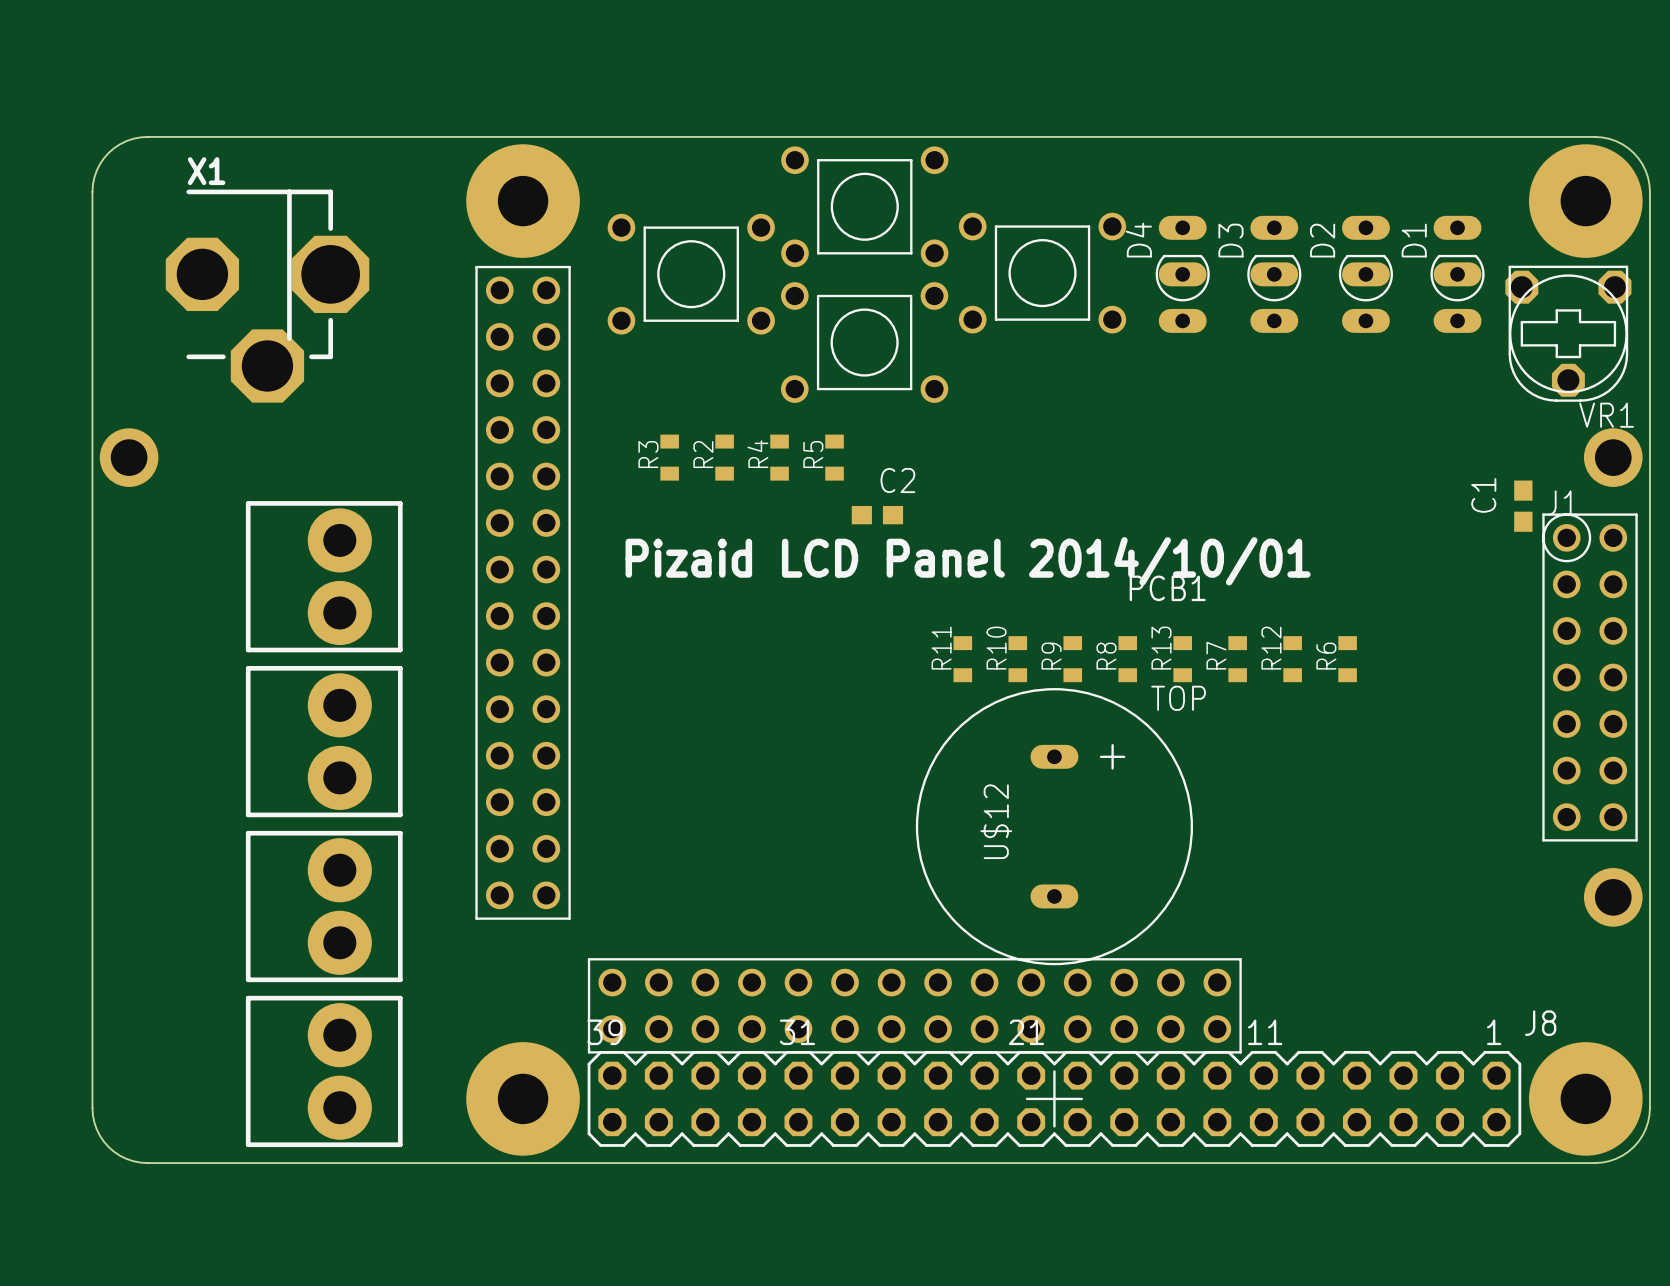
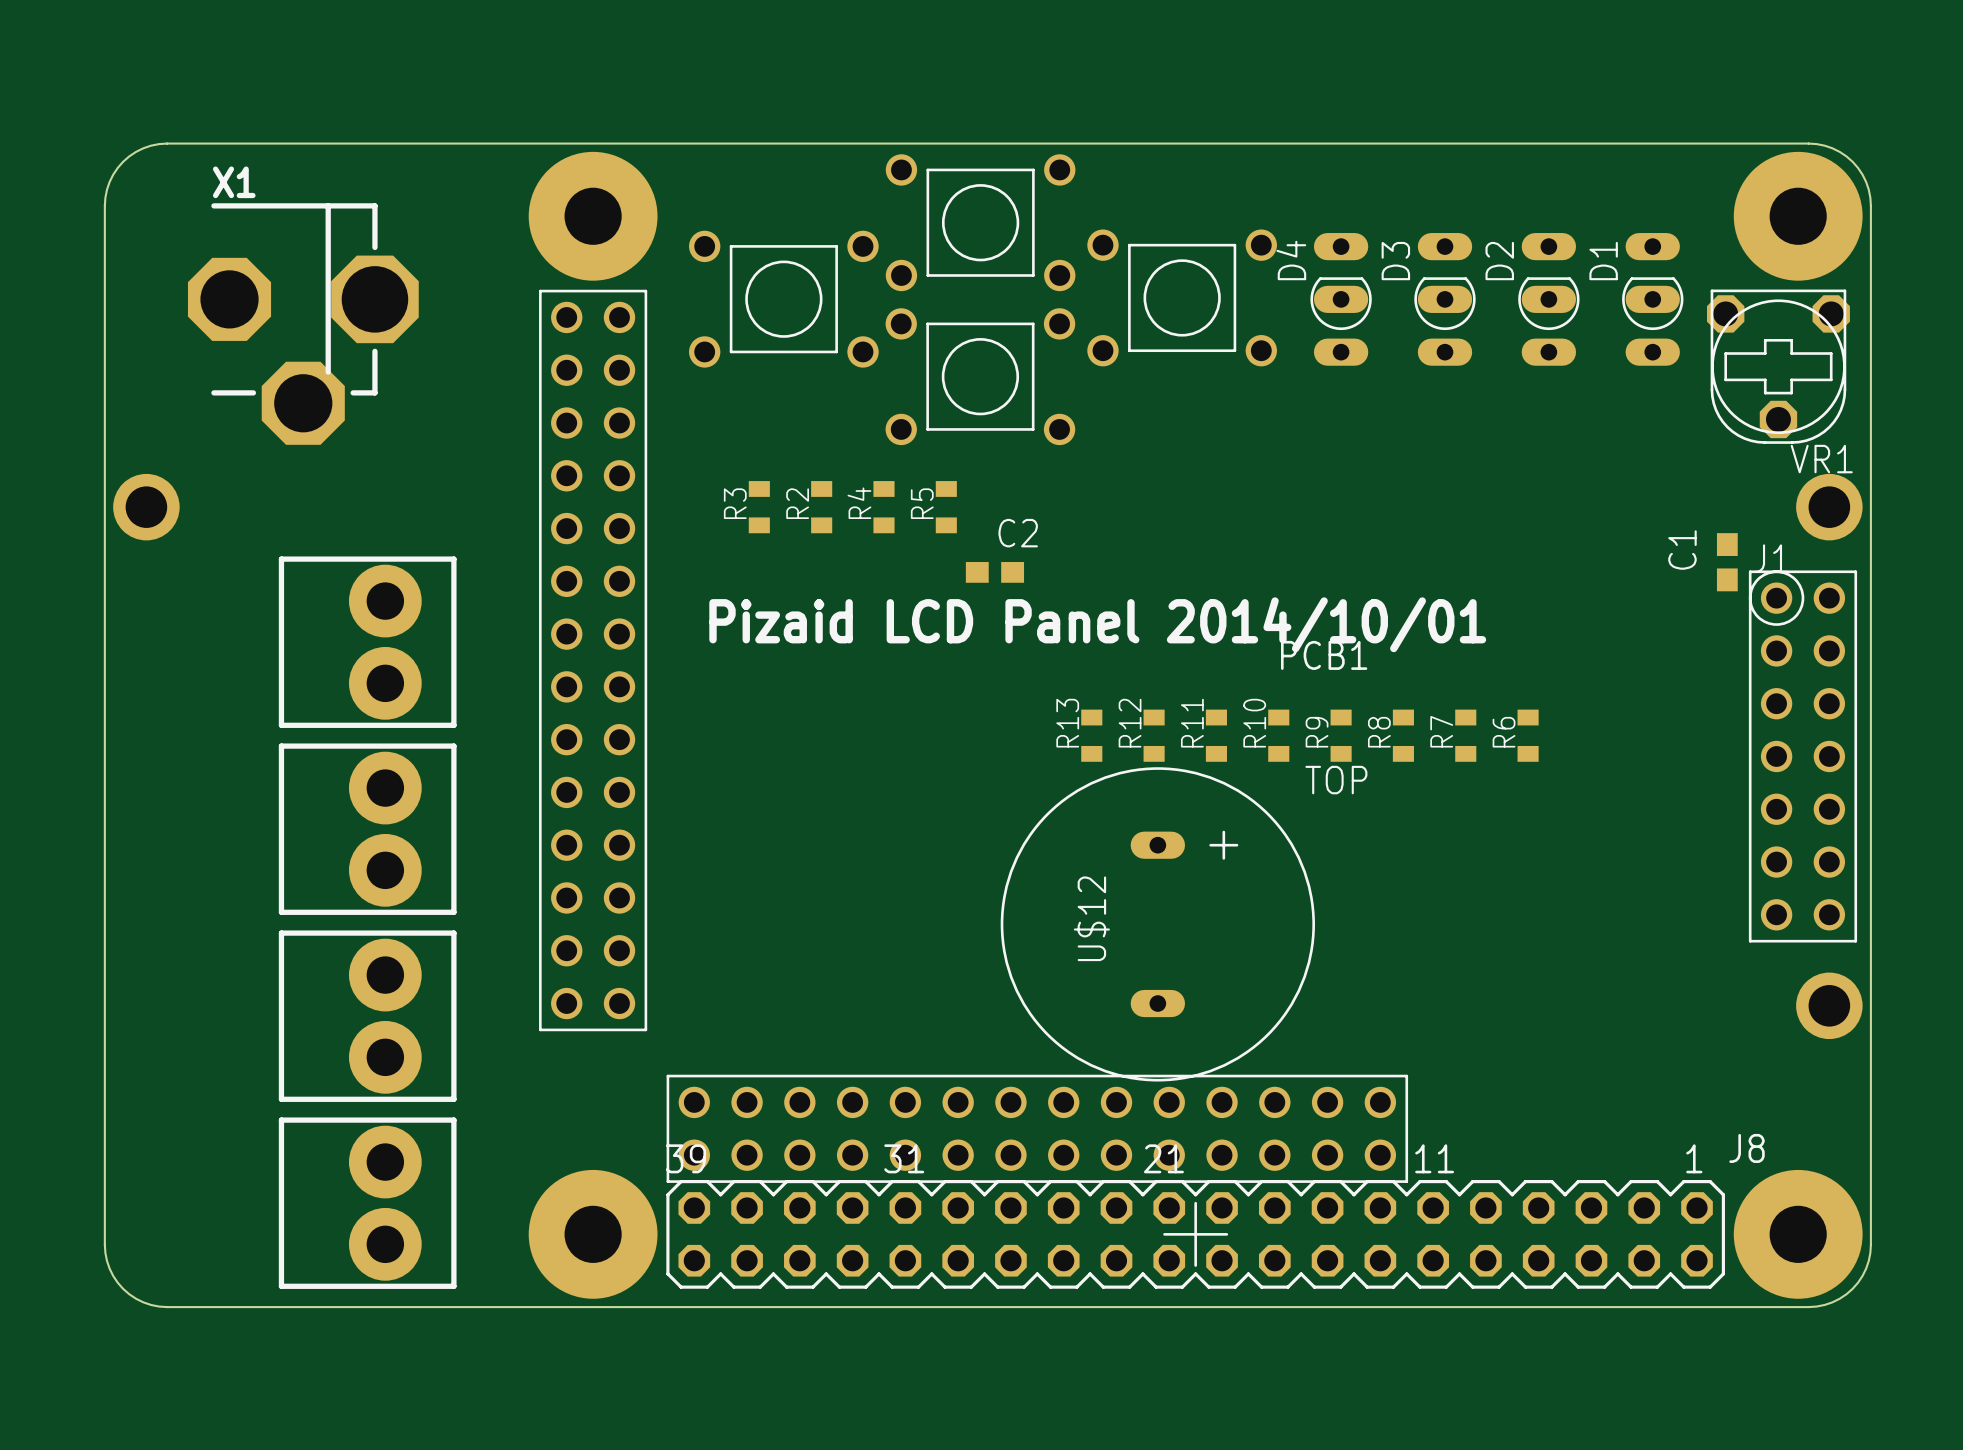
R11 name: R11 (941, 648) -> R13 (1067, 723)
R10 name: R10 (996, 648) -> R12 (1130, 723)
R13 name: R13 (1161, 648) -> R9 (1317, 732)
R12 name: R12 (1271, 648) -> R7 (1441, 731)
R7 name: R7 (1216, 655) -> R8 (1379, 732)
R9 name: R9 (1051, 656) -> R11 (1192, 723)
R8 name: R8 (1106, 656) -> R10 (1254, 723)
U$12 position: (1054, 826) -> (1157, 924)

